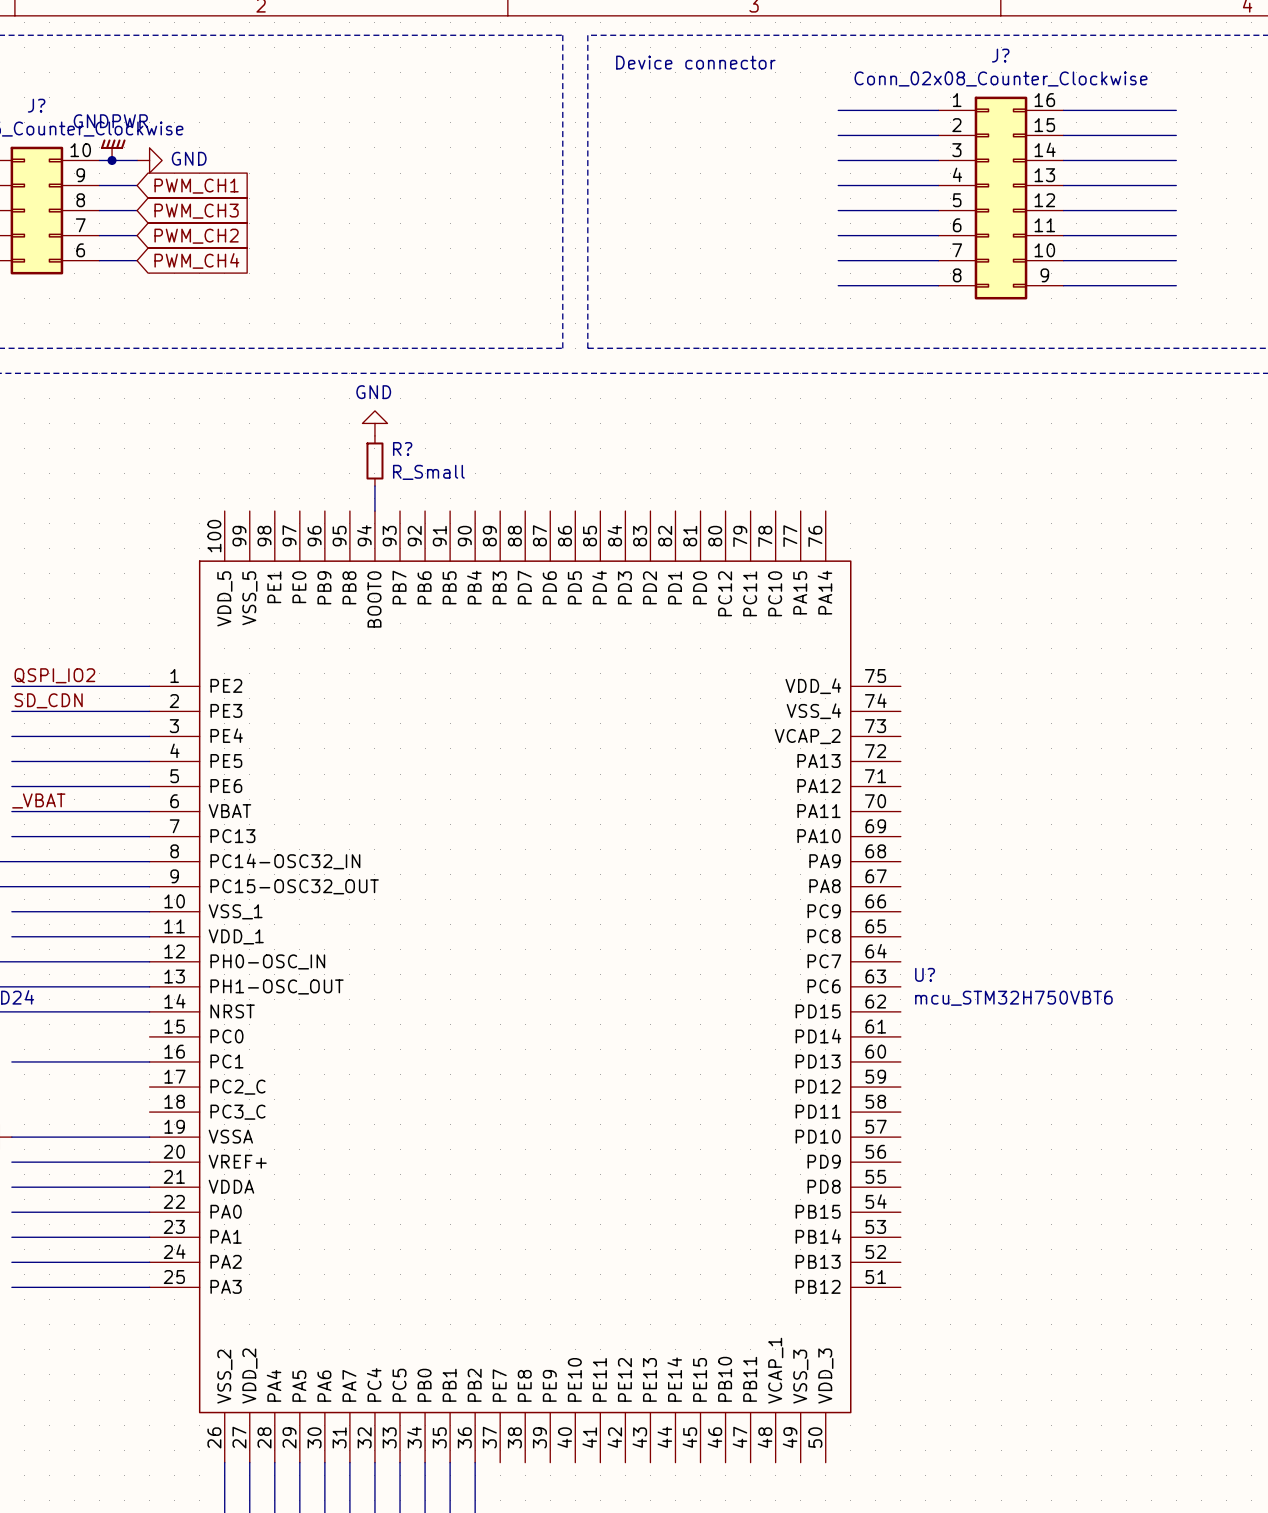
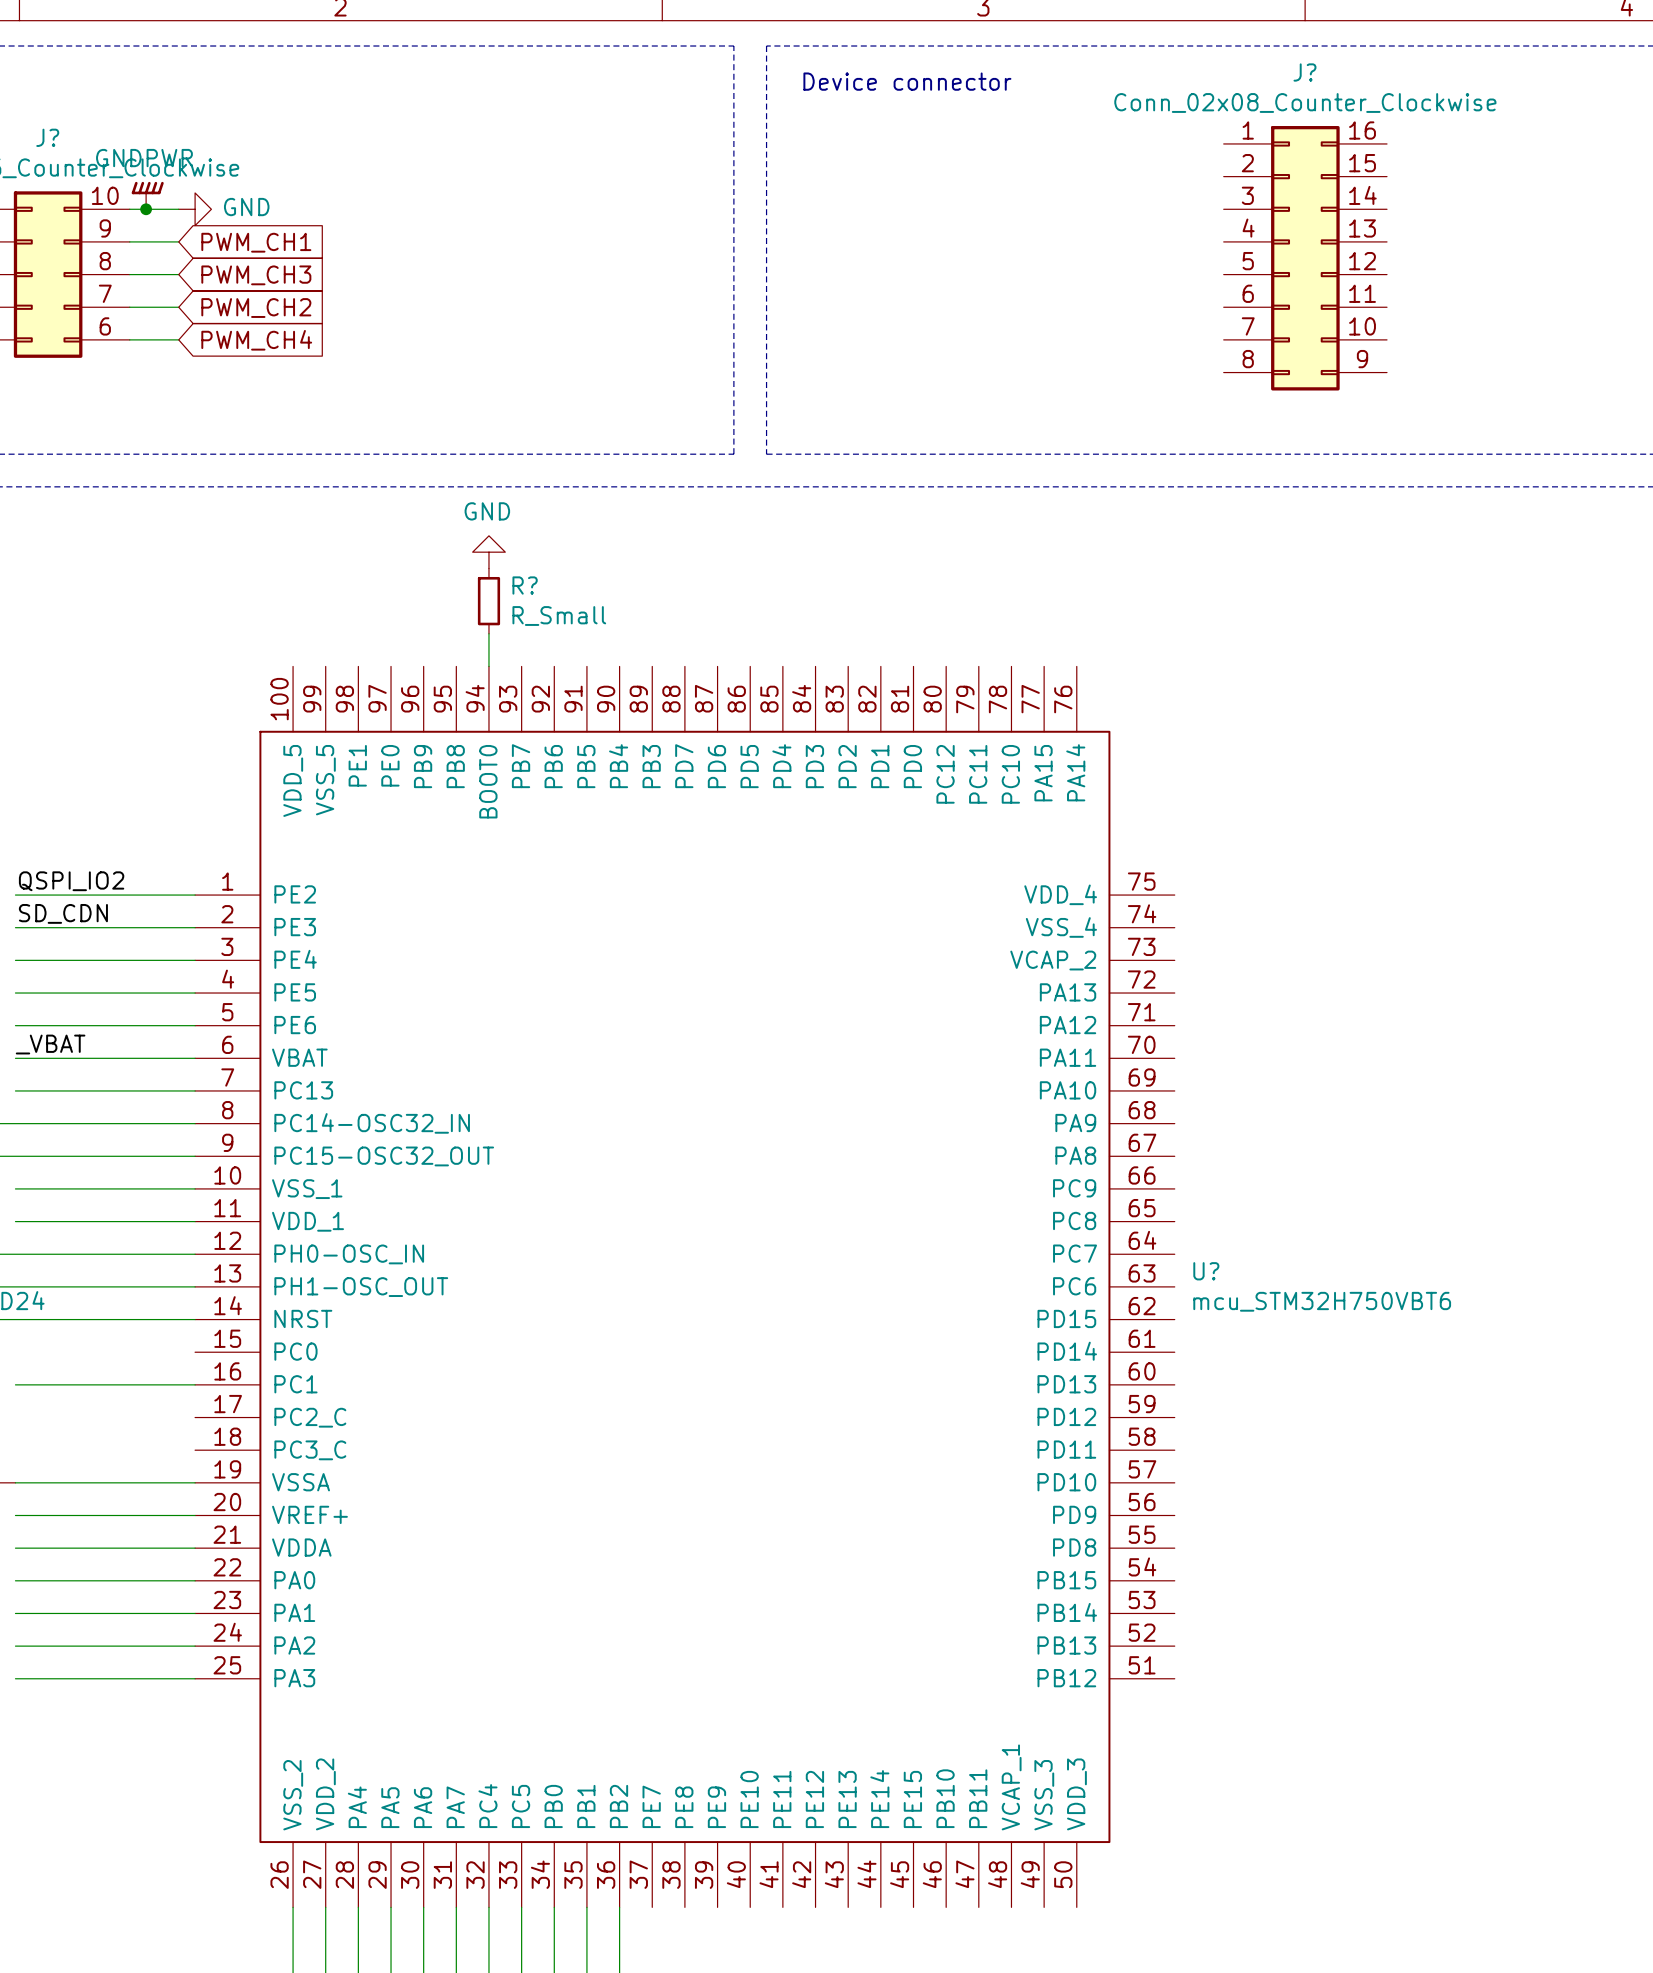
wire: (838, 110) (938, 110) -> none
wire: (1063, 110) (1176, 110) -> none
wire: (838, 135) (938, 135) -> none
wire: (1063, 135) (1176, 135) -> none
wire: (838, 160) (938, 160) -> none
wire: (1063, 160) (1176, 160) -> none
wire: (838, 185) (938, 185) -> none
wire: (1063, 185) (1176, 185) -> none
wire: (838, 210) (938, 210) -> none
wire: (1063, 210) (1176, 210) -> none
wire: (838, 235) (938, 235) -> none
wire: (1063, 235) (1176, 235) -> none
wire: (838, 260) (938, 260) -> none
wire: (1063, 260) (1176, 260) -> none
wire: (838, 285) (938, 285) -> none
wire: (1063, 285) (1176, 285) -> none

